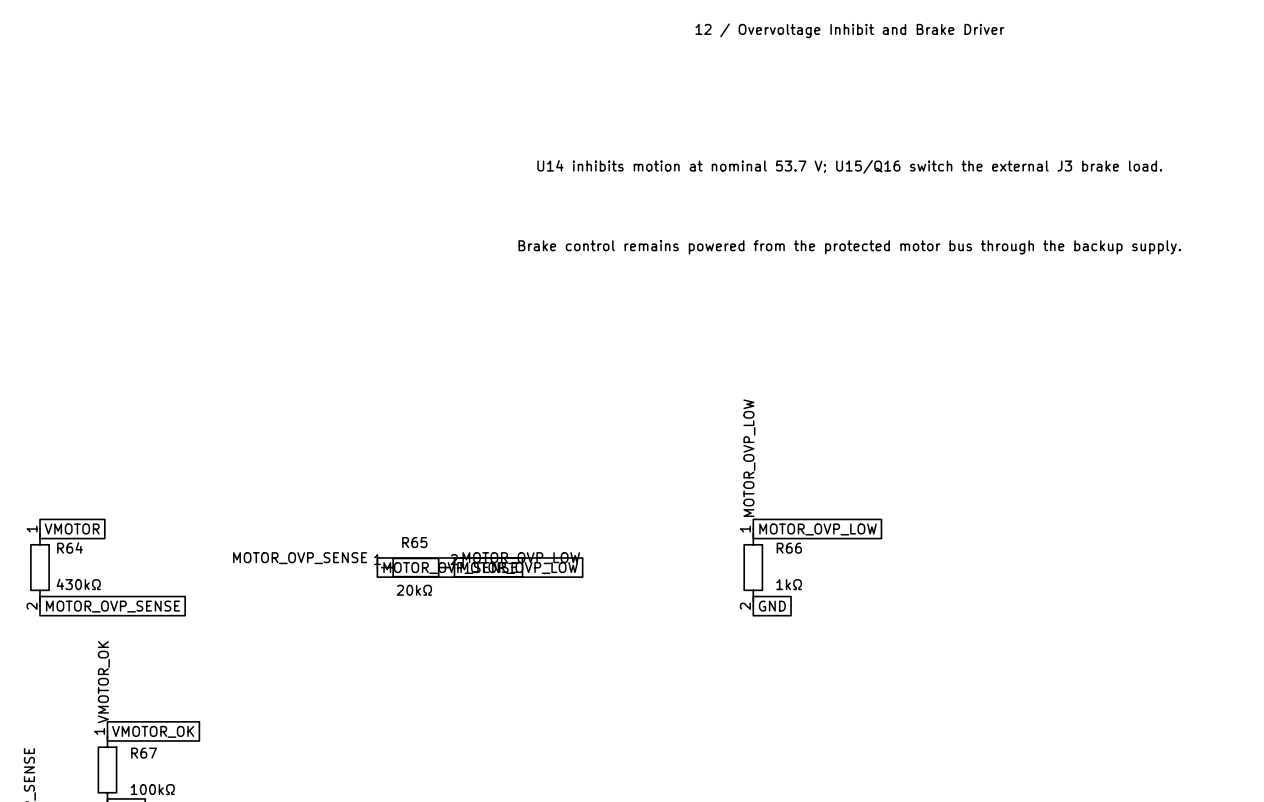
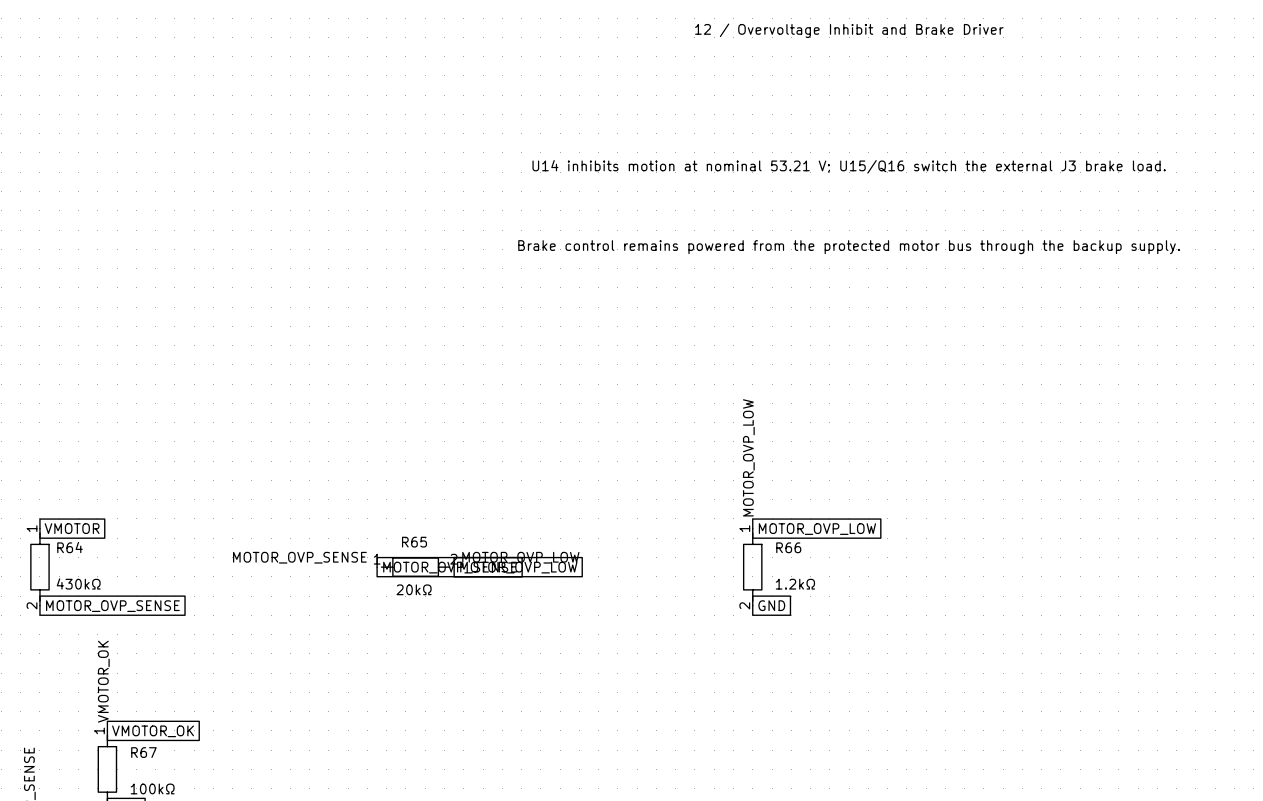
text: U14 inhibits motion at nominal 53.7 V; U15/Q16 switch the external J3 brake load. (849, 166) -> U14 inhibits motion at nominal 53.21 V; U15/Q16 switch the external J3 brake load. (849, 166)
R66 value: 1kΩ (789, 584) -> 1.2kΩ (795, 584)

